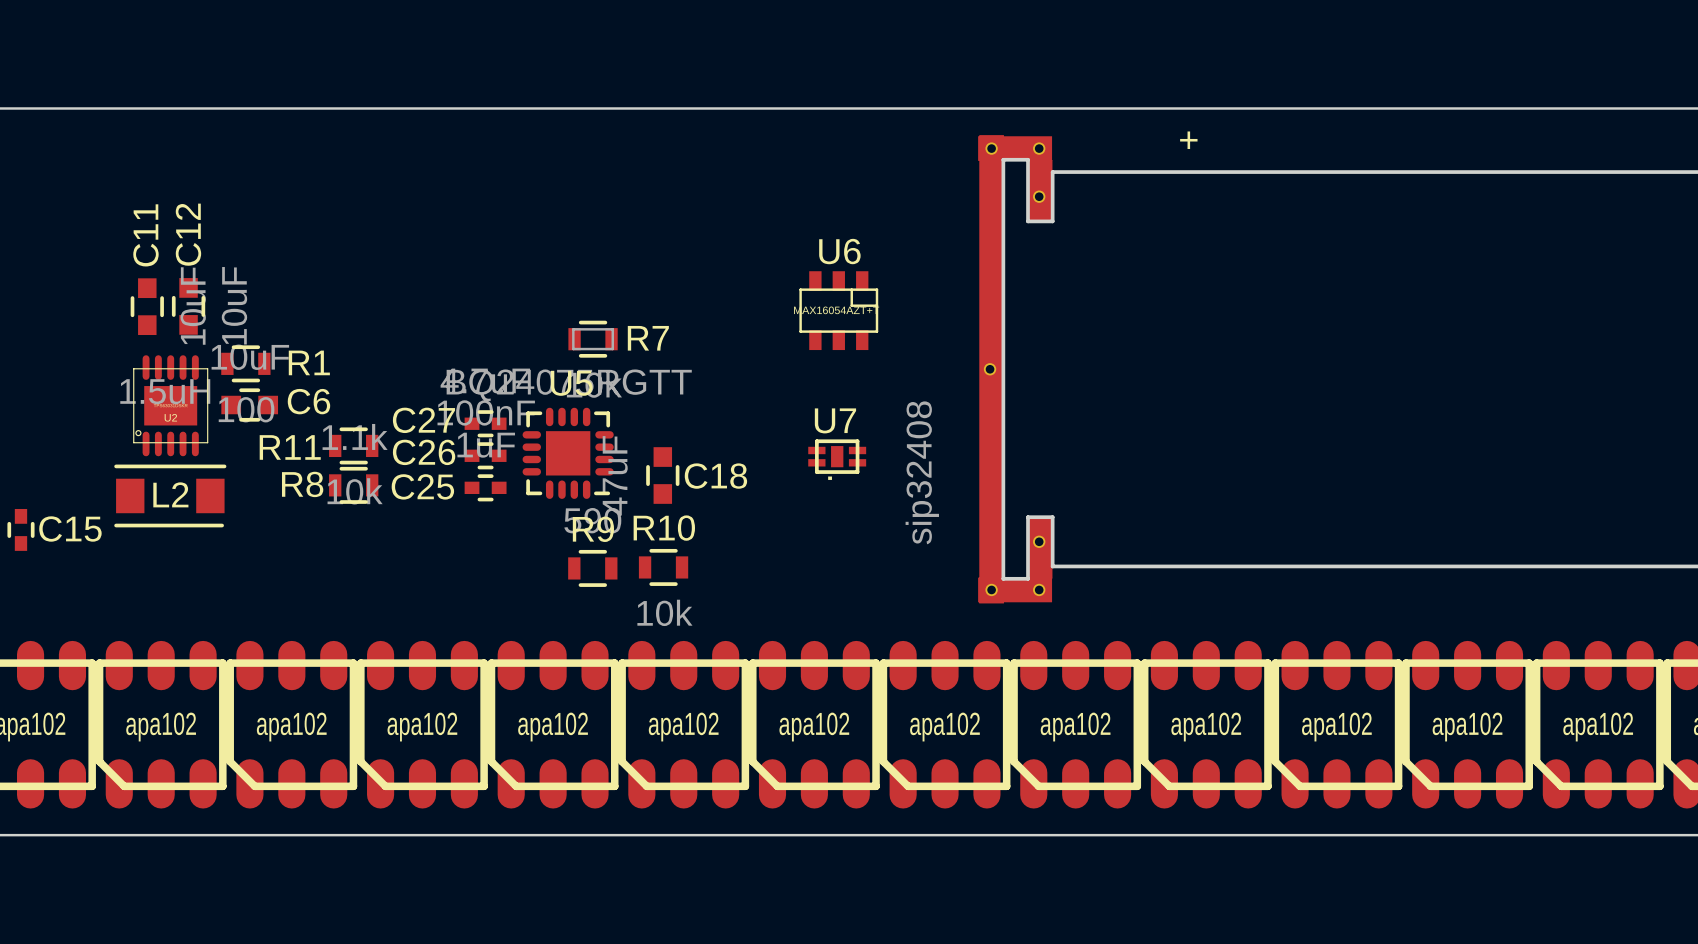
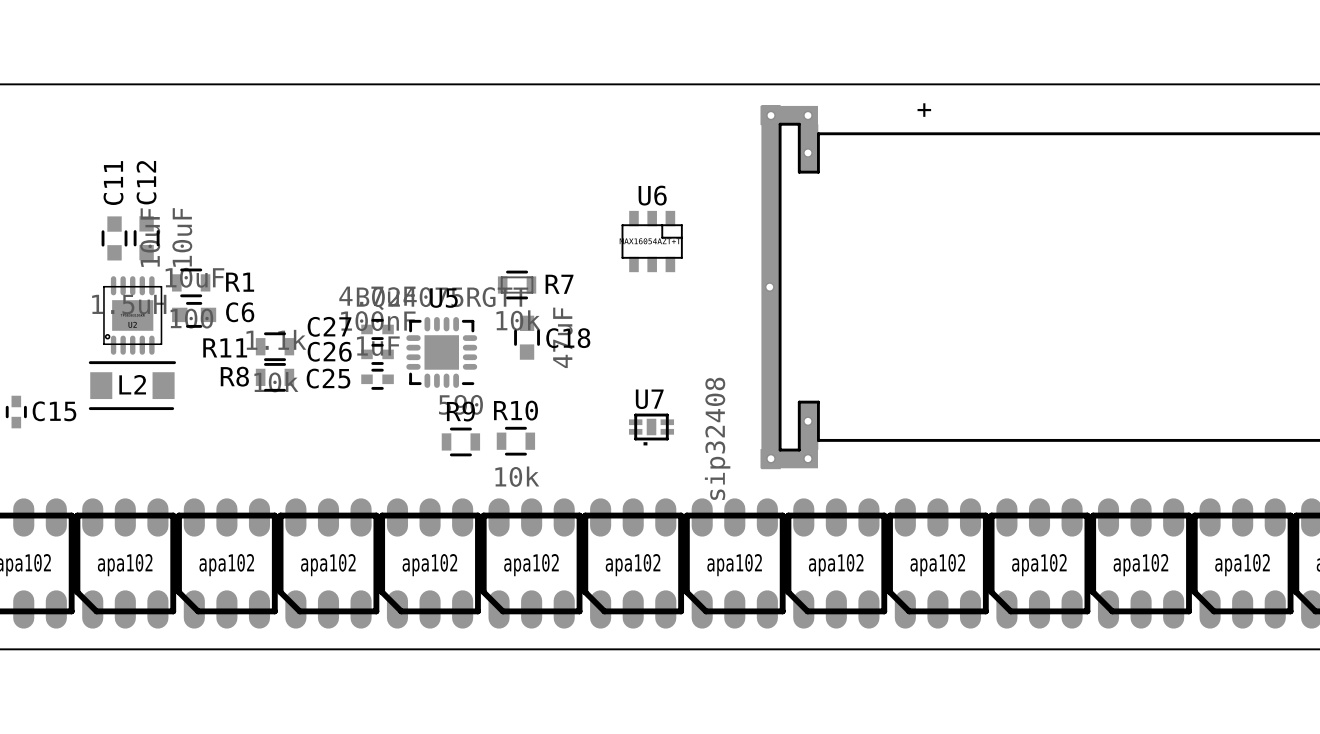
R7 position: (593, 339) -> (517, 285)
U7 position: (837, 456) -> (651, 427)
C18 value position: 47uF (615, 475) -> 47uF (562, 337)
C18 position: (662, 475) -> (527, 337)

